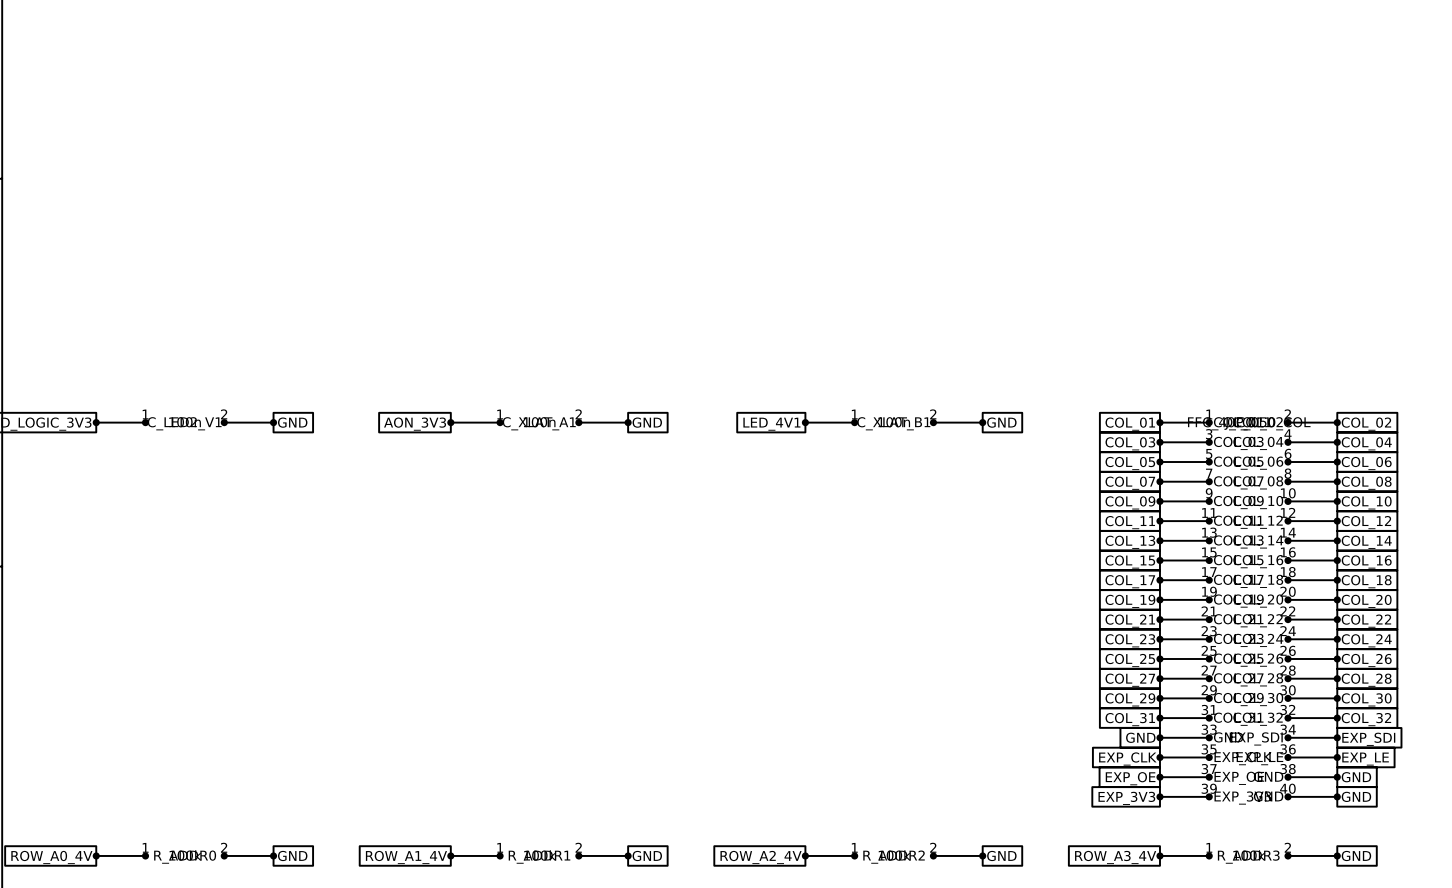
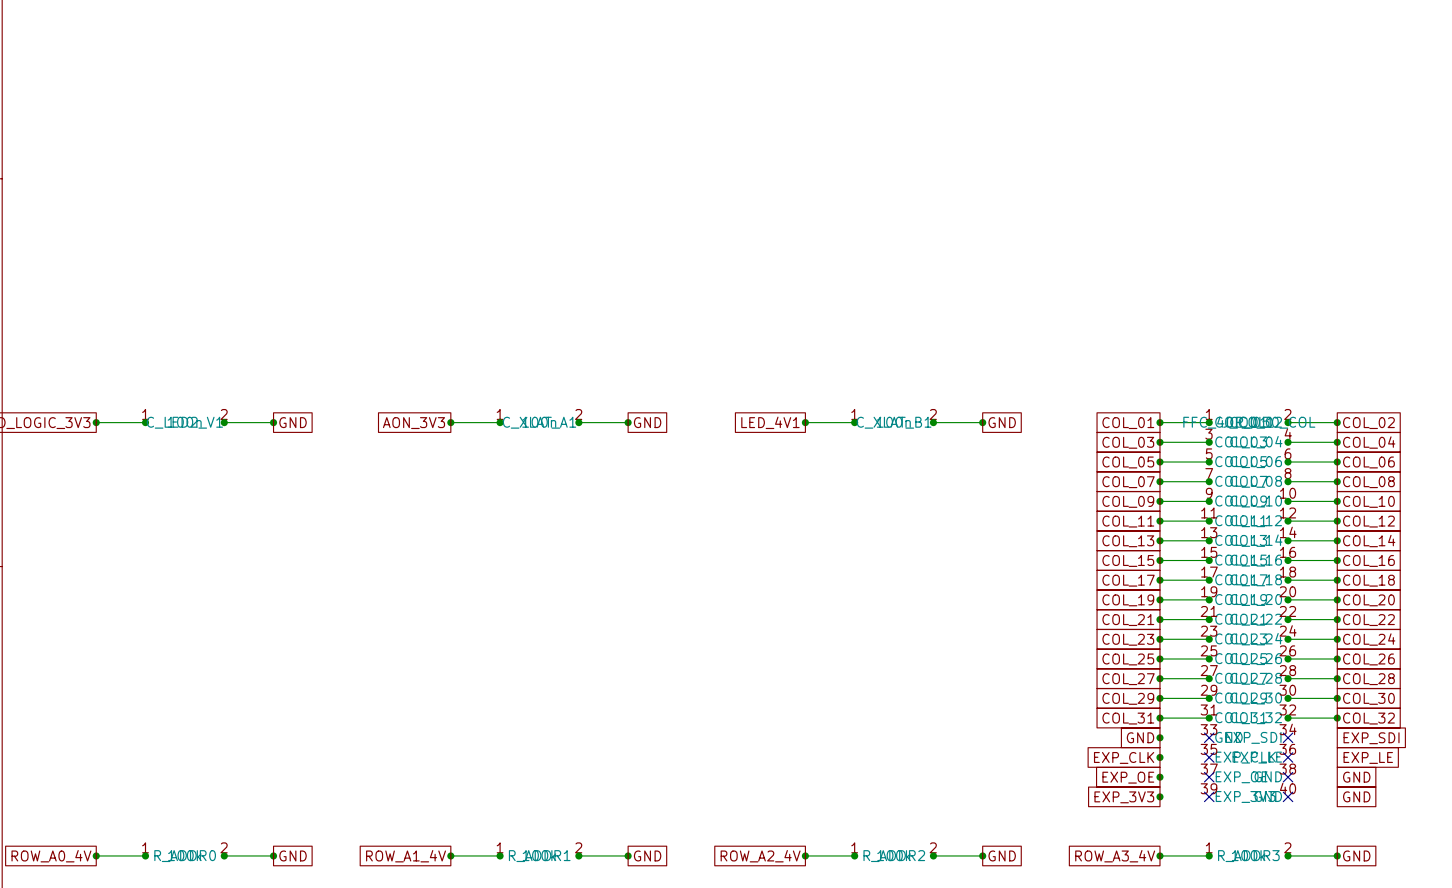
wire: (1159, 737) (1209, 737) -> none
junction: (1209, 737) -> none
no-connect mark: none -> (1209, 737)
wire: (1288, 737) (1337, 737) -> none
junction: (1288, 737) -> none
no-connect mark: none -> (1288, 737)
junction: (1337, 737) -> none
wire: (1159, 757) (1209, 757) -> none
junction: (1209, 757) -> none
no-connect mark: none -> (1209, 757)
wire: (1288, 757) (1337, 757) -> none
junction: (1288, 757) -> none
no-connect mark: none -> (1288, 757)
junction: (1337, 757) -> none
wire: (1159, 777) (1209, 777) -> none
junction: (1209, 777) -> none
no-connect mark: none -> (1209, 777)
wire: (1288, 777) (1337, 777) -> none
junction: (1288, 777) -> none
no-connect mark: none -> (1288, 777)
junction: (1337, 777) -> none
wire: (1159, 796) (1209, 796) -> none
junction: (1209, 796) -> none
no-connect mark: none -> (1209, 796)
wire: (1288, 796) (1337, 796) -> none
junction: (1288, 796) -> none
no-connect mark: none -> (1288, 796)
junction: (1337, 796) -> none

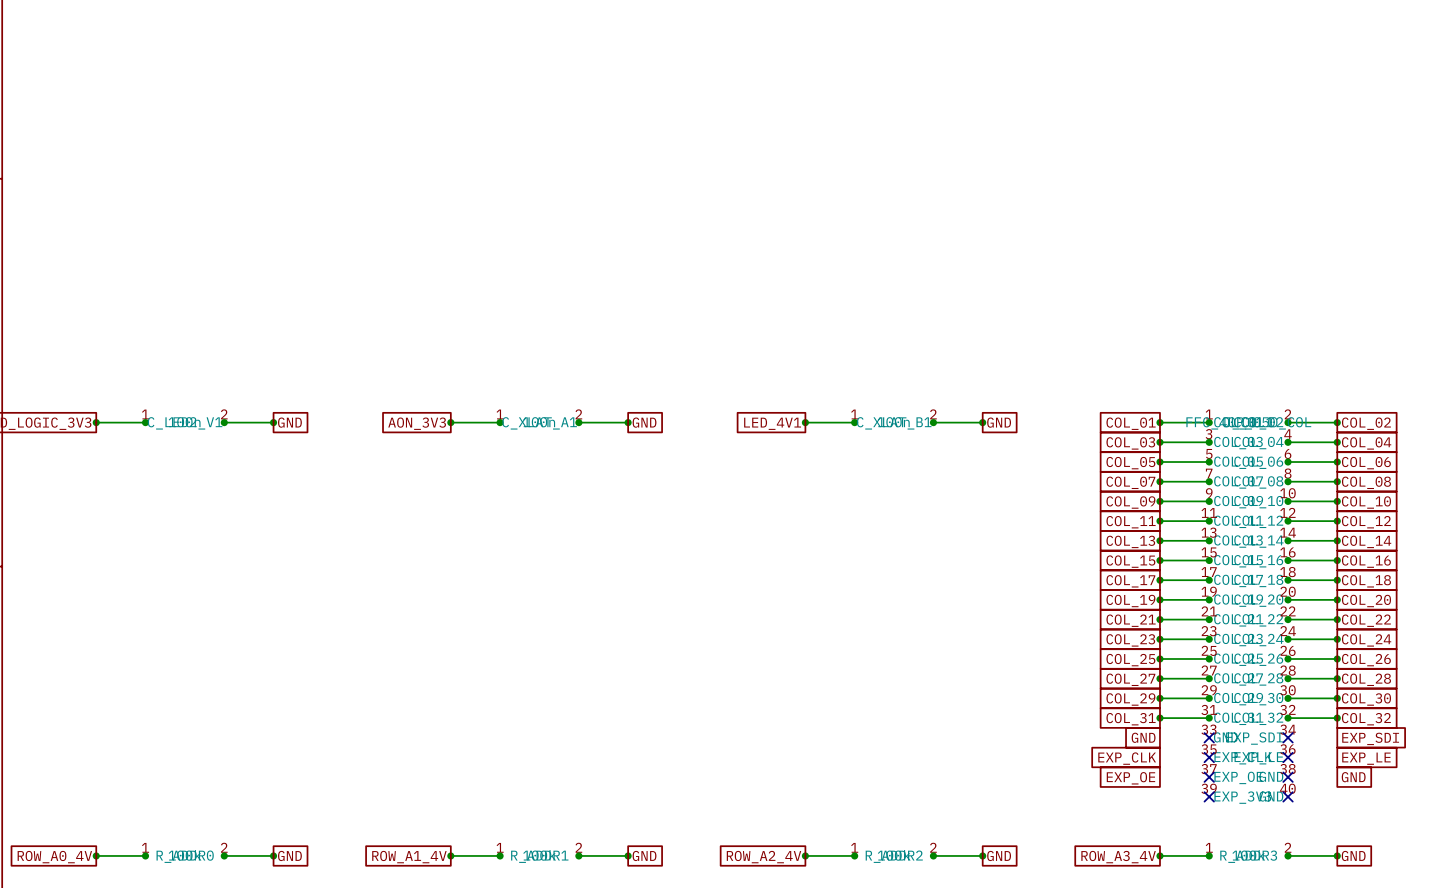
junction: (1159, 737) -> none
junction: (1159, 757) -> none
junction: (1159, 777) -> none
junction: (1159, 796) -> none
global label: GND (1356, 796) -> none
global label: EXP_3V3 (1124, 797) -> none

